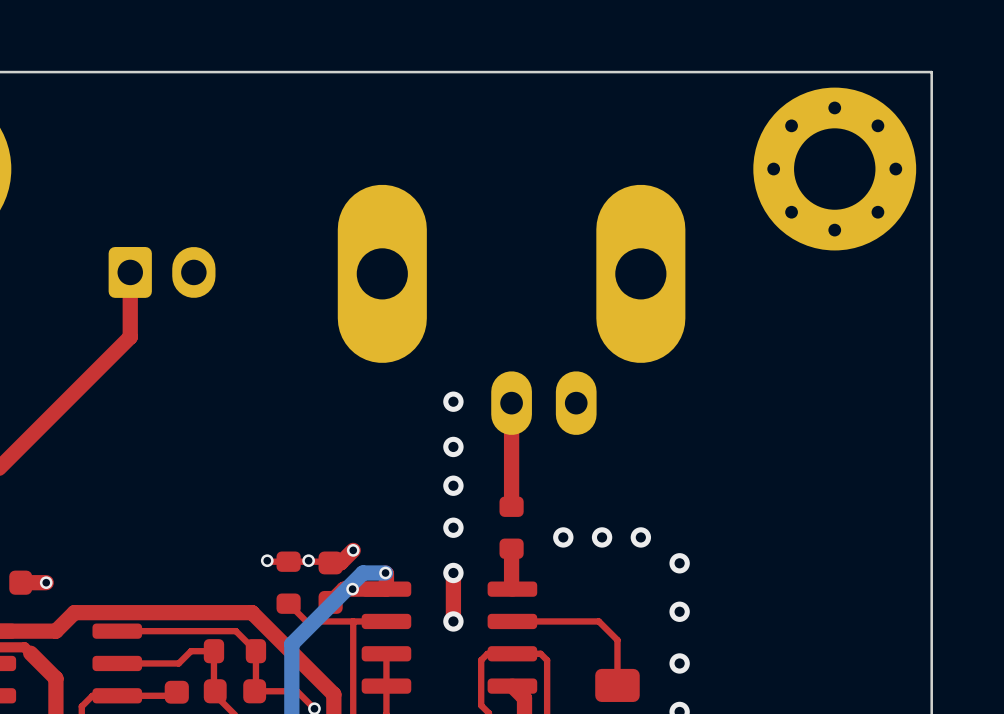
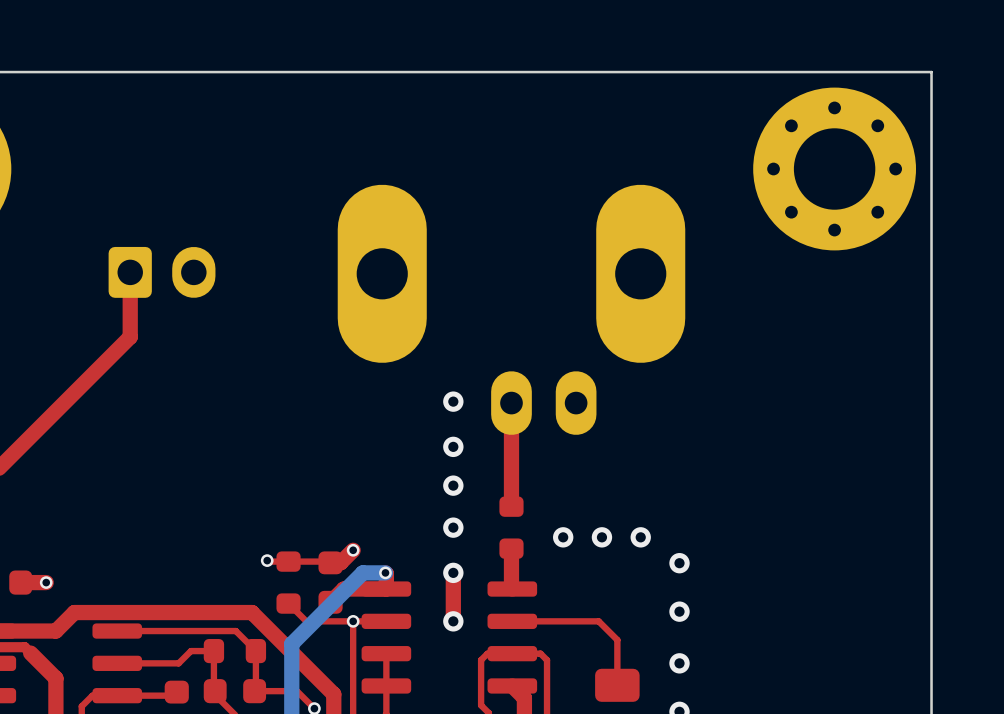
via: (308, 560) -> none
via position: (352, 589) -> (353, 621)

